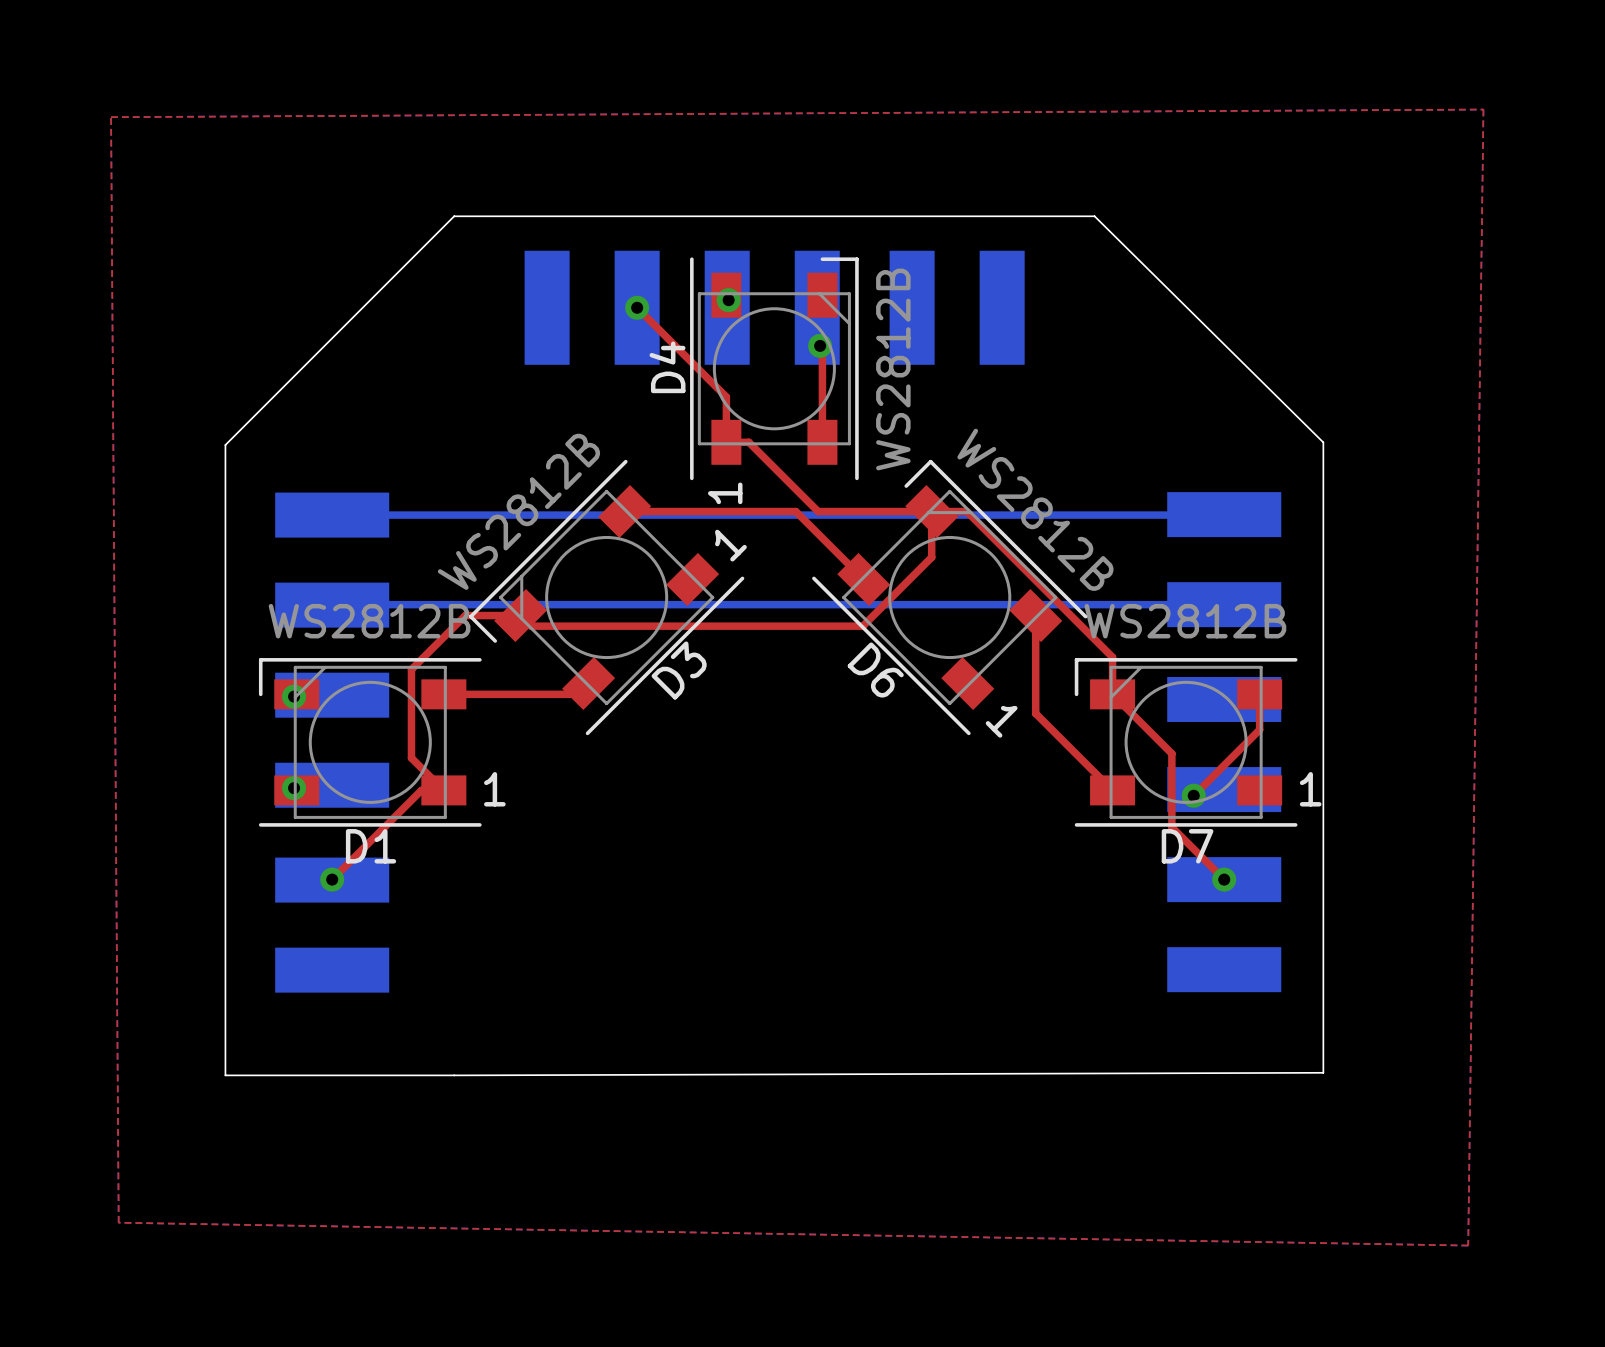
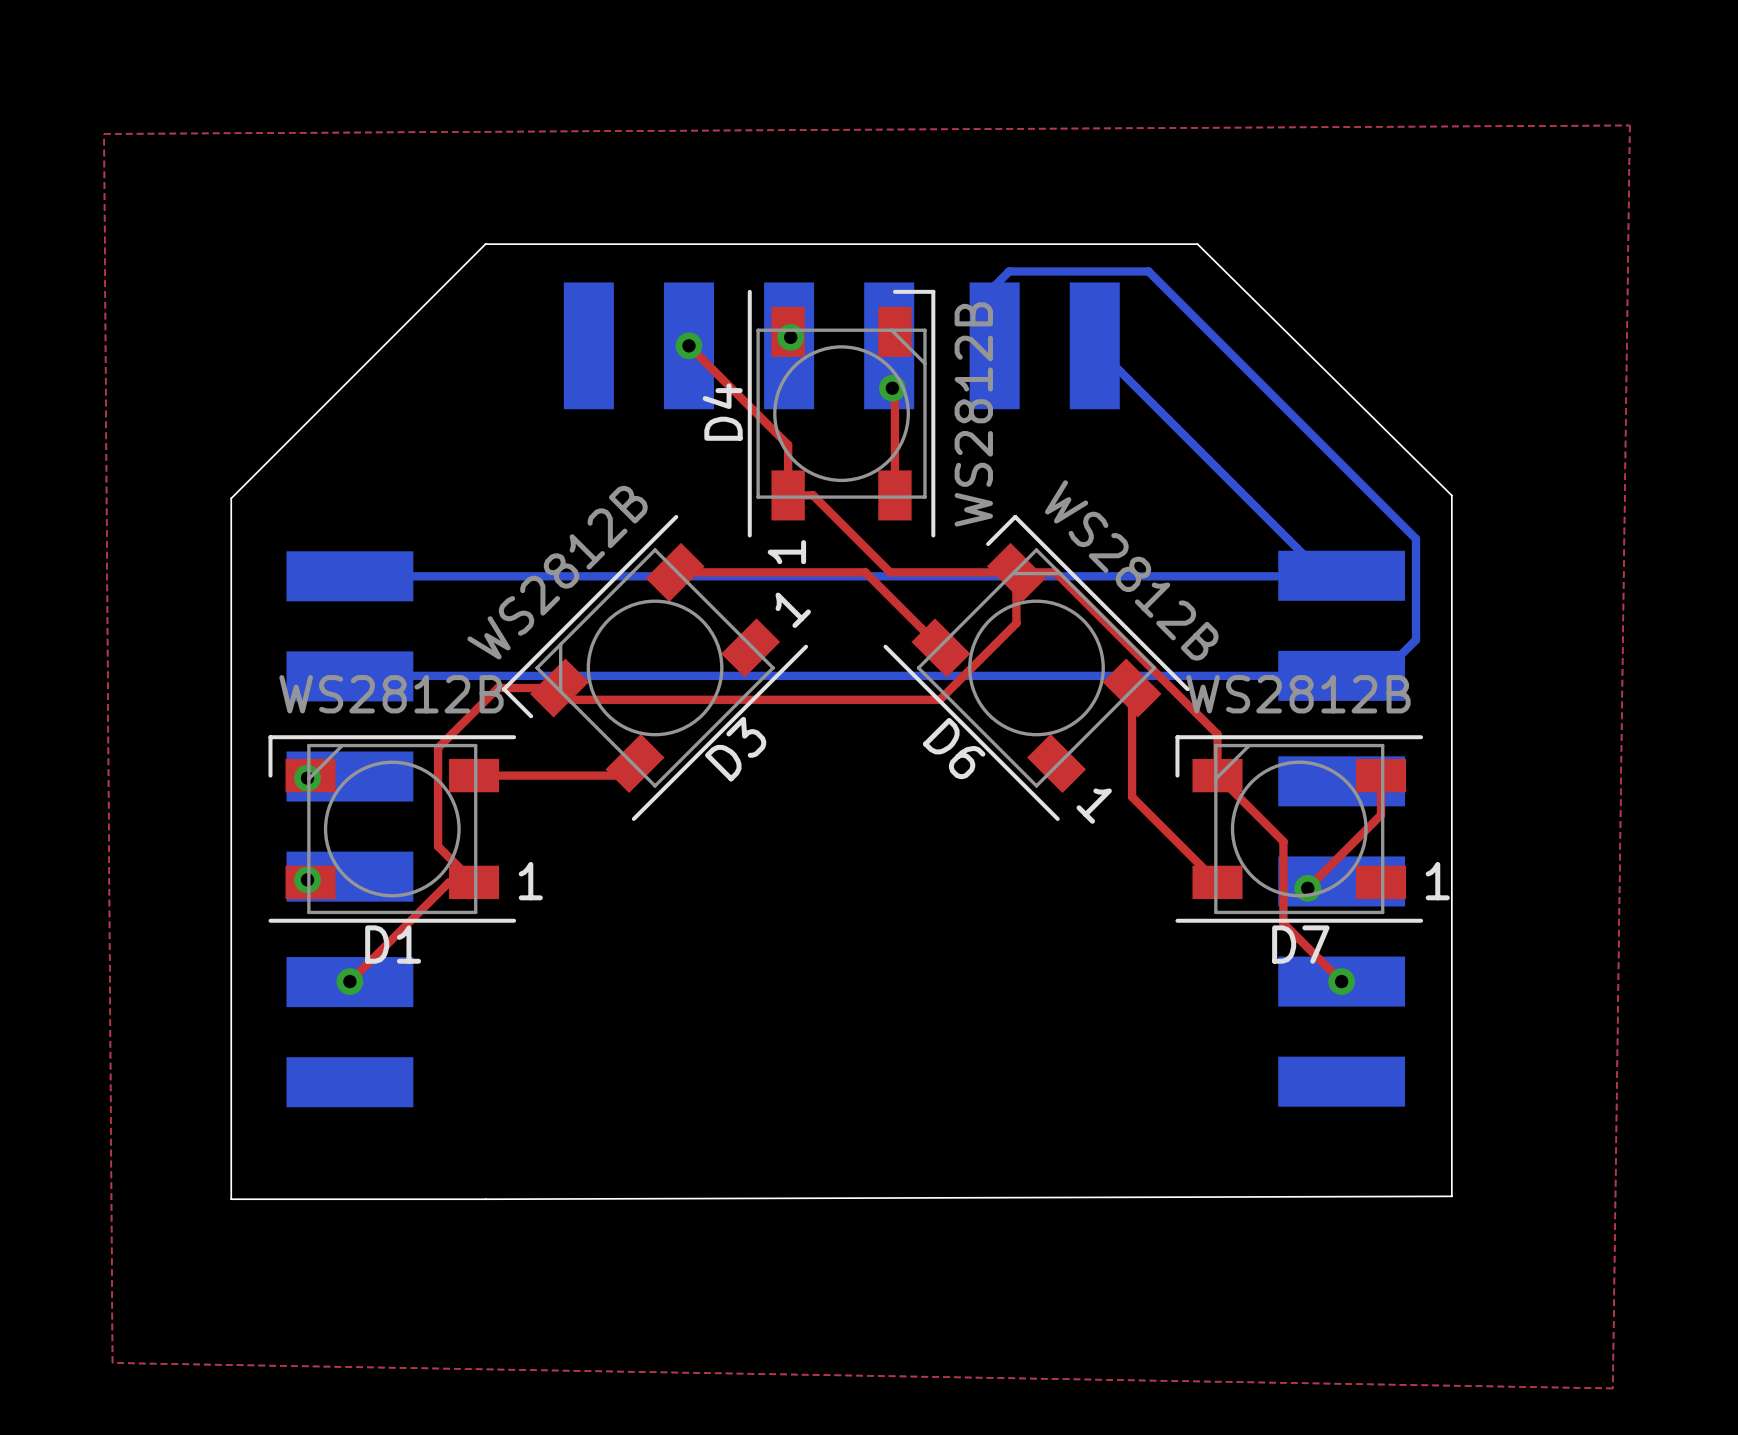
bottom track: none -> (994, 345) (994, 285) (1009, 271) (1148, 271) (1416, 538) (1416, 639) (1380, 675) (1341, 675)
bottom track: none -> (1094, 345) (1324, 575) (1341, 575)

